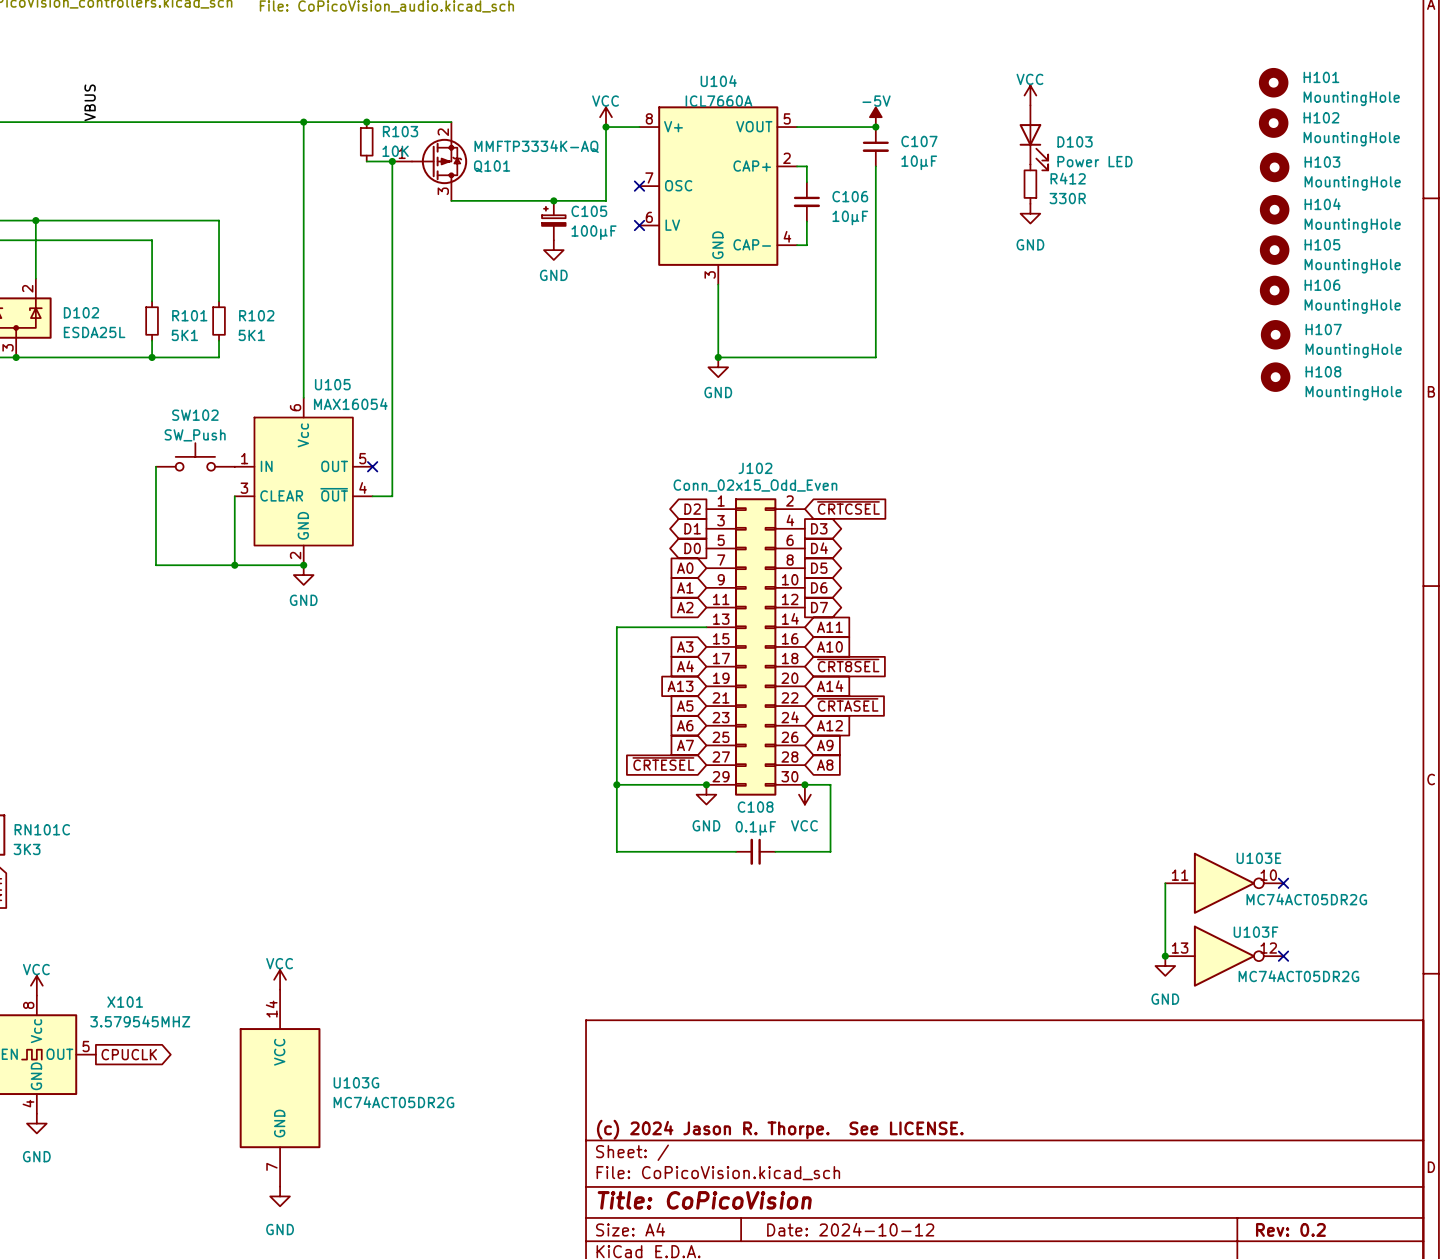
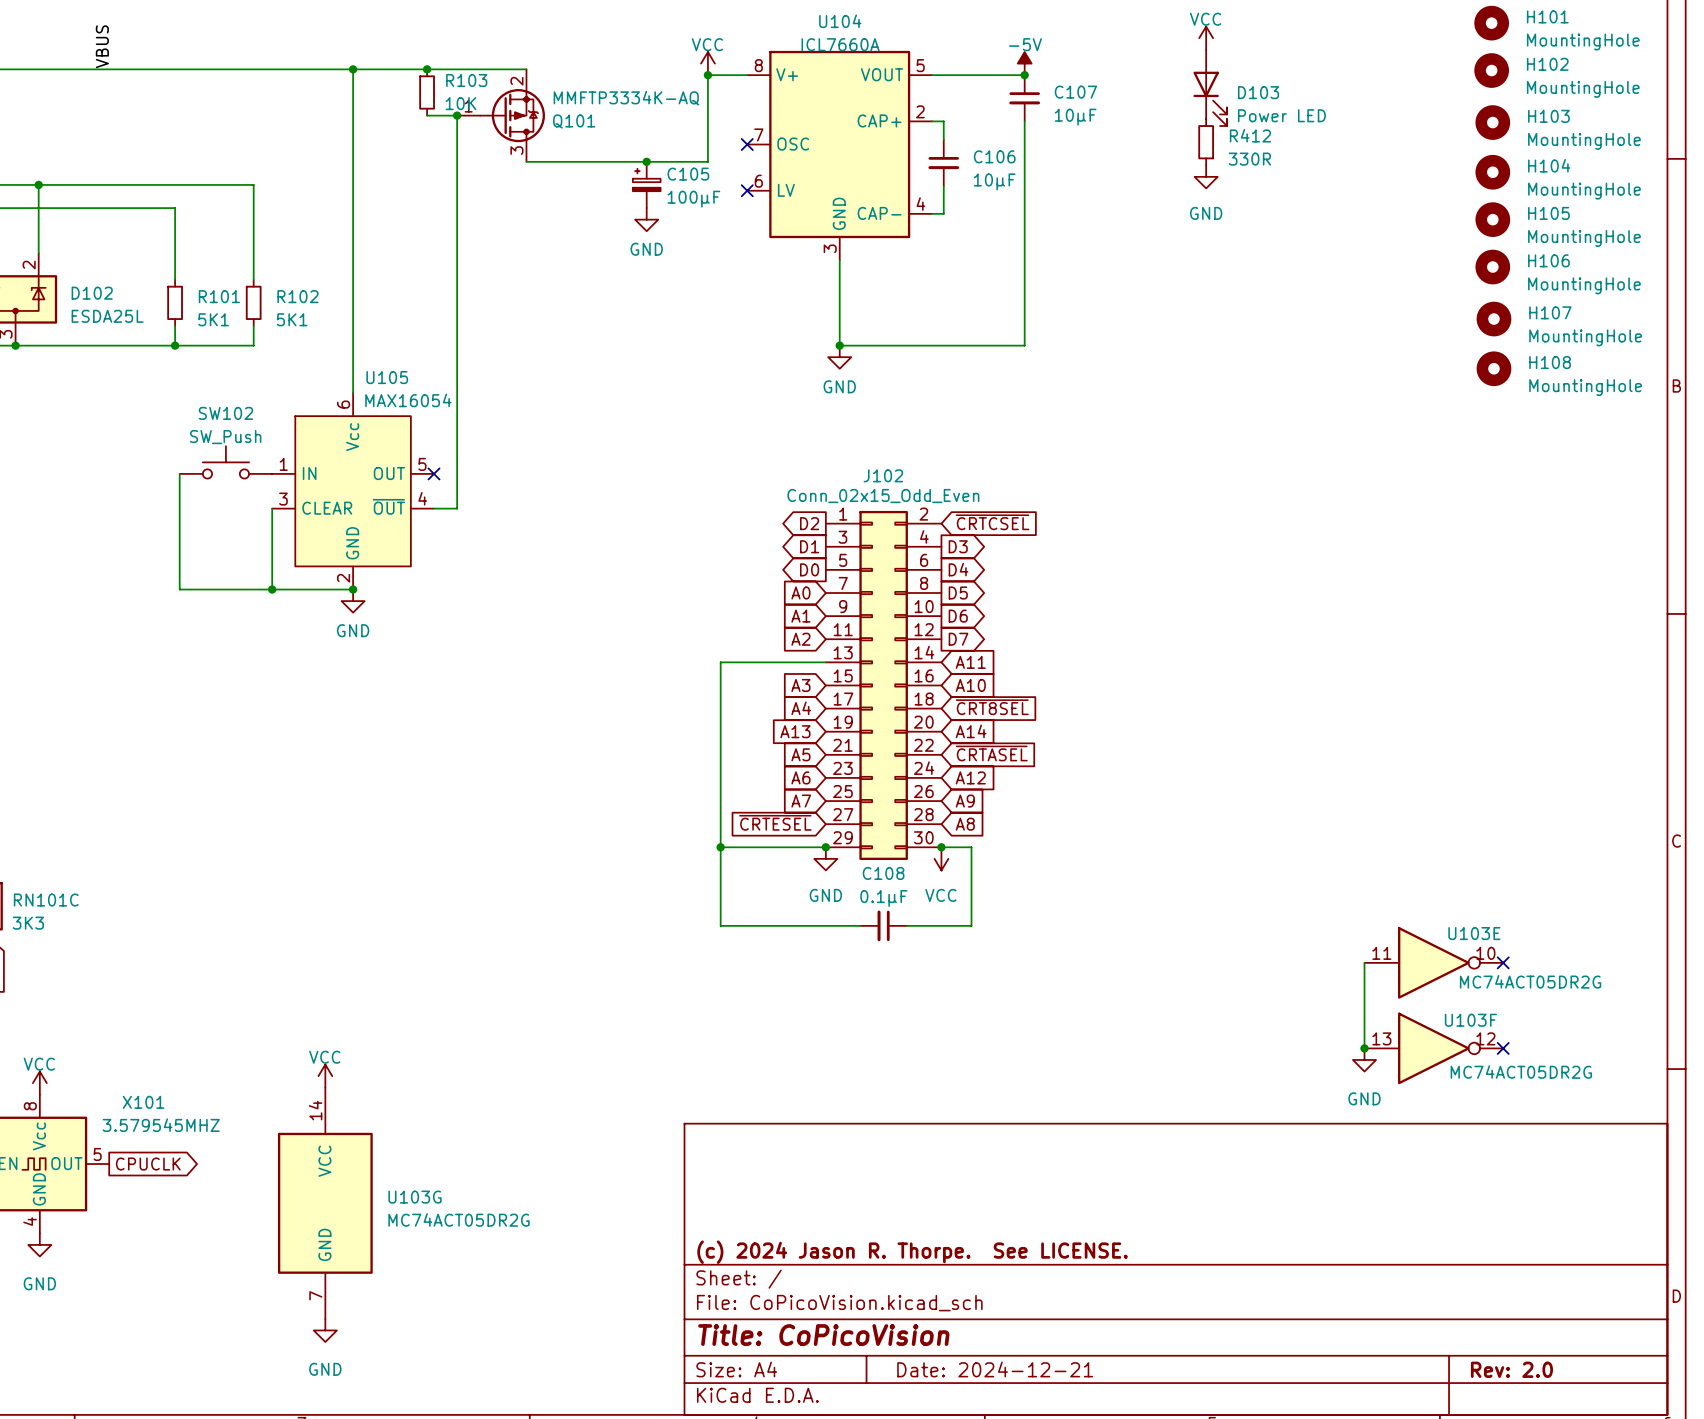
title block: Date: 2024-10-12 (850, 1229) -> Date: 2024-12-21 (995, 1369)
title block: Rev: 0.2 (1290, 1229) -> Rev: 2.0 (1511, 1369)

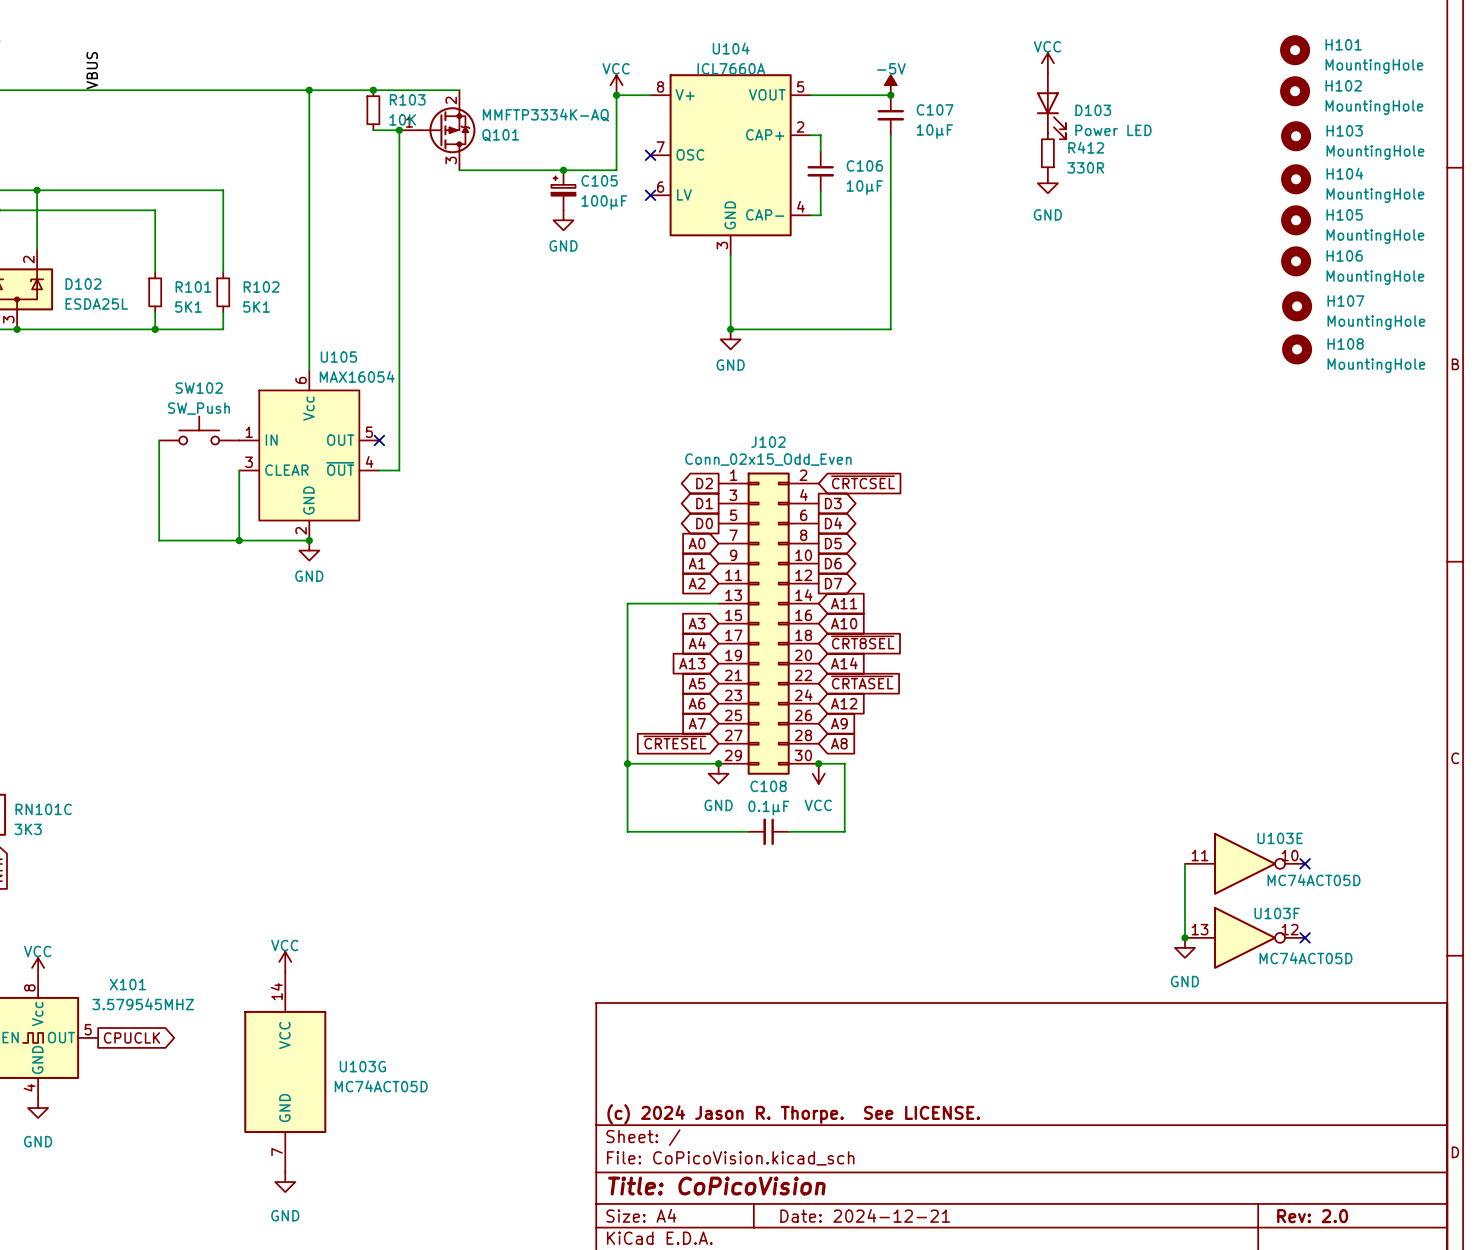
U103E value: MC74ACT05DR2G (1530, 981) -> MC74ACT05D (1313, 880)
U103F value: MC74ACT05DR2G (1521, 1071) -> MC74ACT05D (1305, 958)
U103G value: MC74ACT05DR2G (459, 1219) -> MC74ACT05D (381, 1086)

